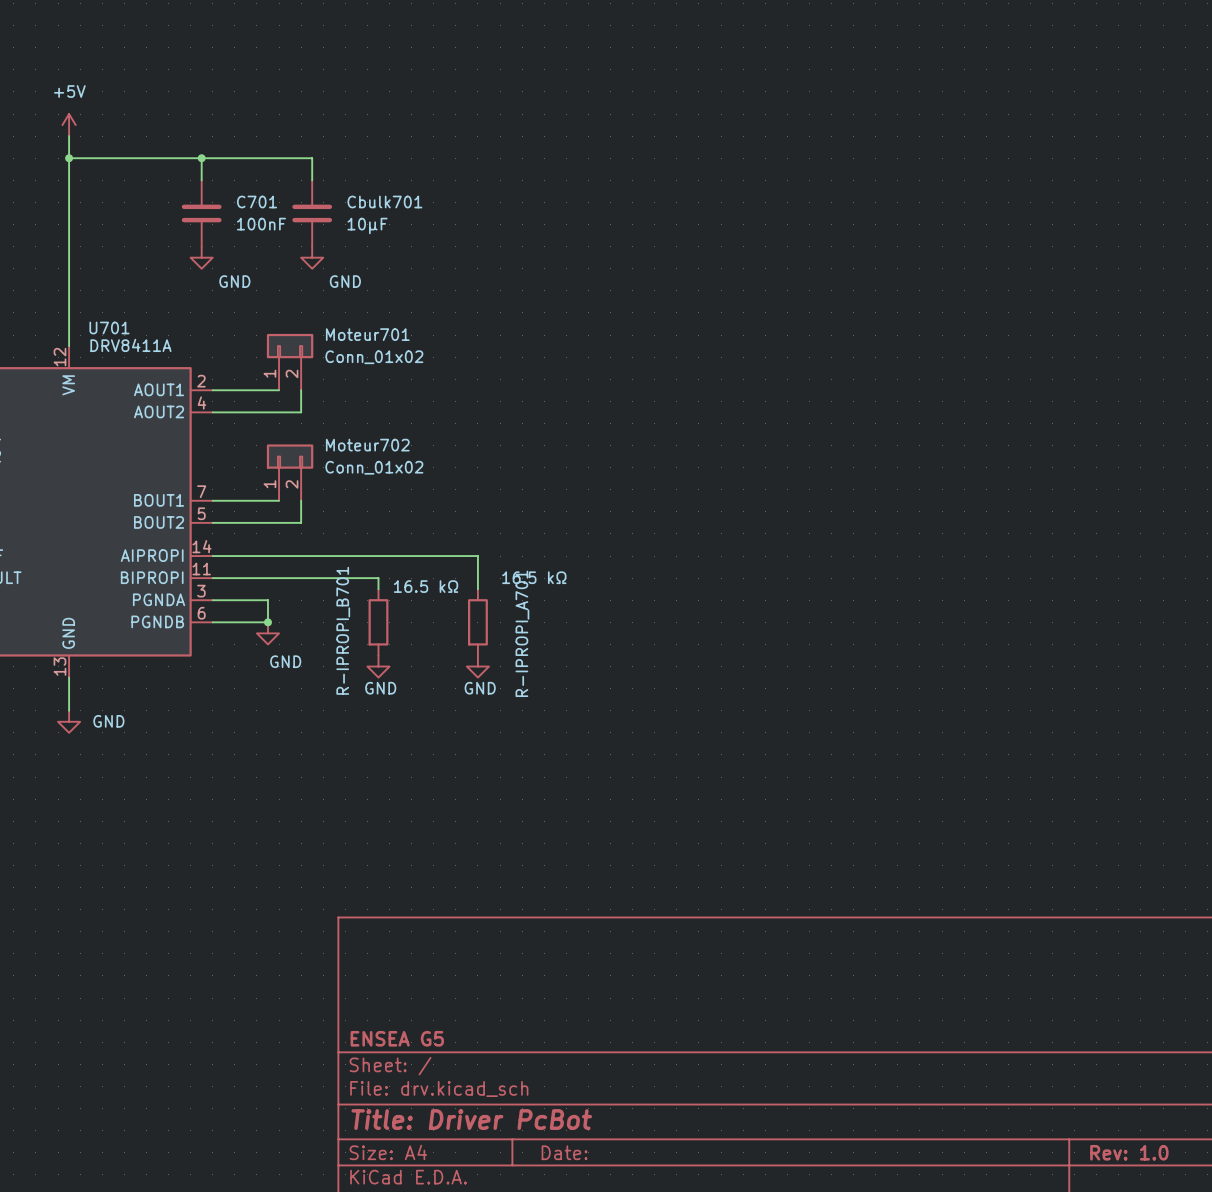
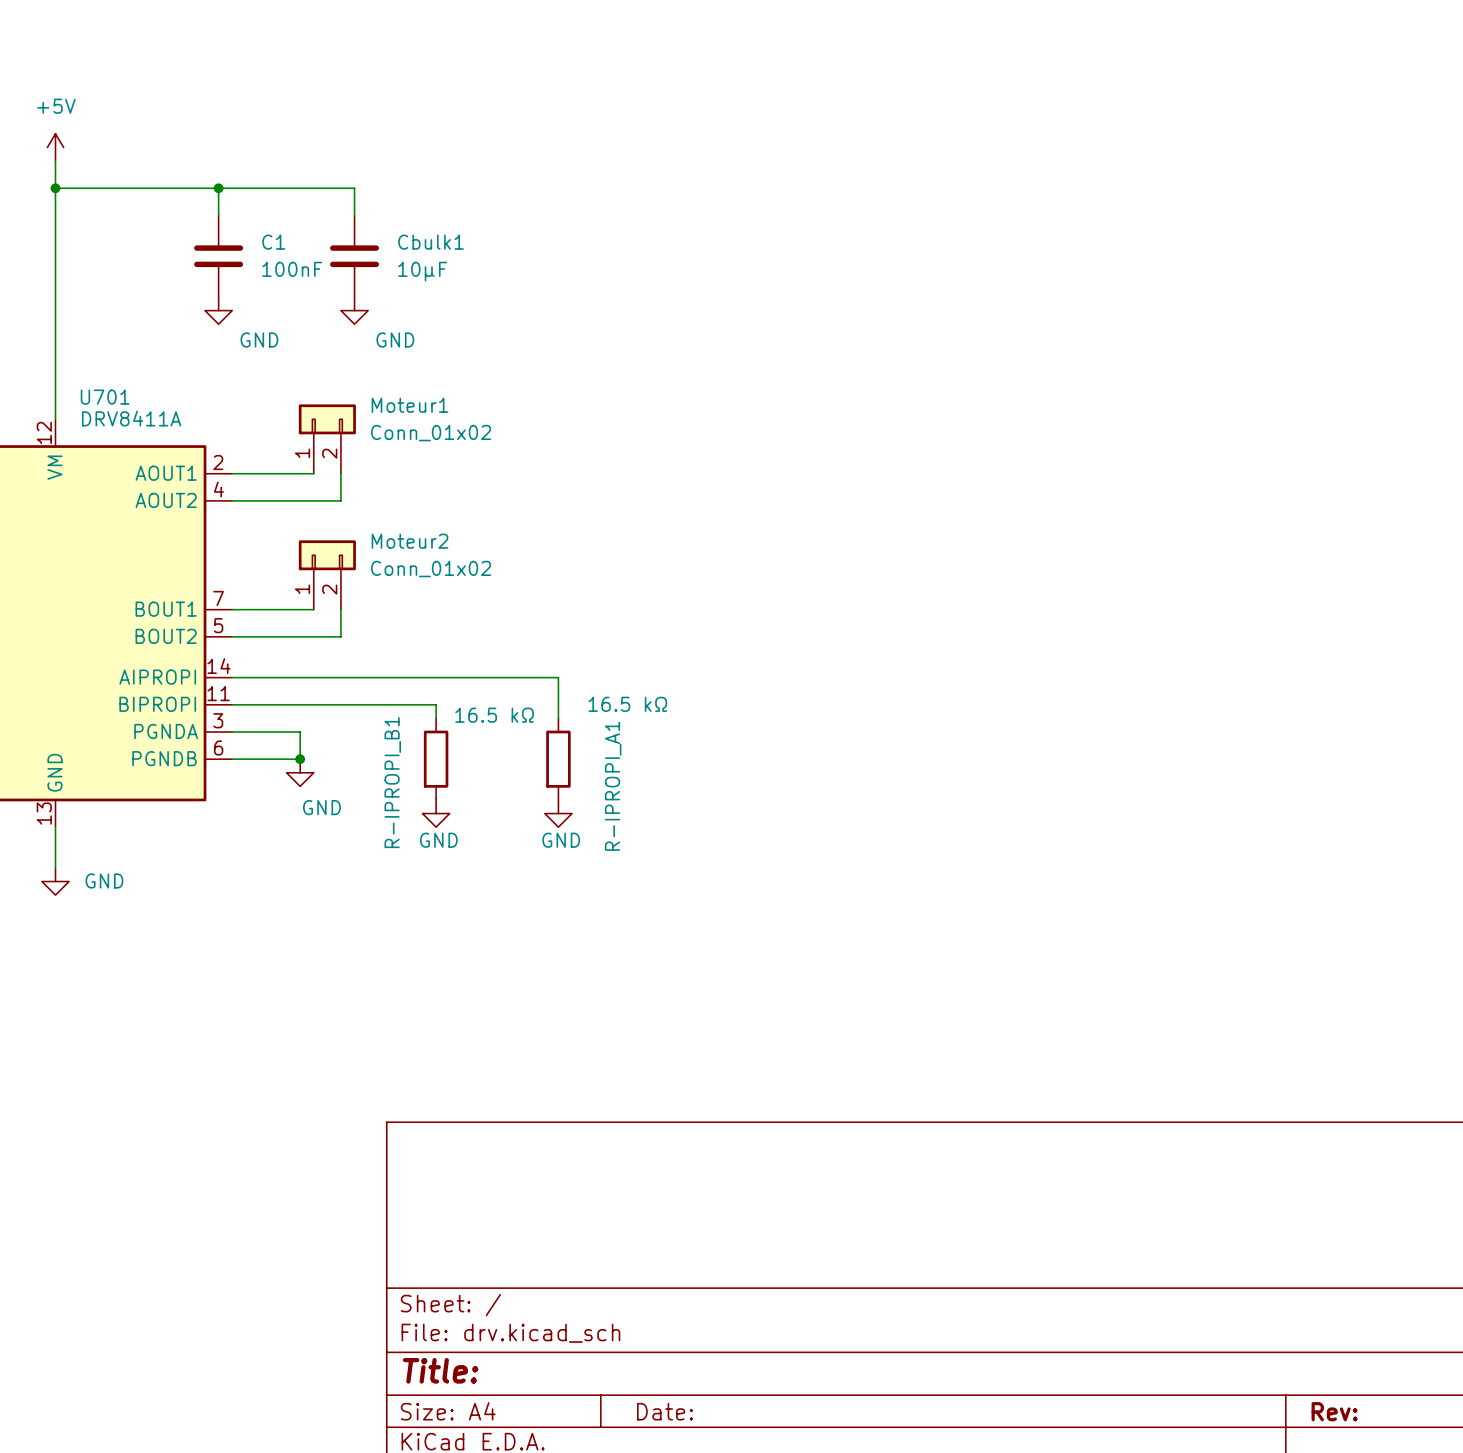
C701 name: C701 (257, 202) -> C1 (273, 242)
Cbulk701 name: Cbulk701 (384, 202) -> Cbulk1 (431, 242)
Moteur701 name: Moteur701 (367, 334) -> Moteur1 (409, 405)
Moteur702 name: Moteur702 (367, 445) -> Moteur2 (409, 541)
R-IPROPI_B701 name: R-IPROPI_B701 (343, 630) -> R-IPROPI_B1 (392, 782)
R-IPROPI_A701 name: R-IPROPI_A701 (522, 633) -> R-IPROPI_A1 (613, 786)
title block: ENSEA G5 (397, 1038) -> none
title block: Title: Driver PcBot (471, 1119) -> Title: (440, 1370)
title block: Rev: 1.0 (1129, 1152) -> Rev: (1334, 1411)

